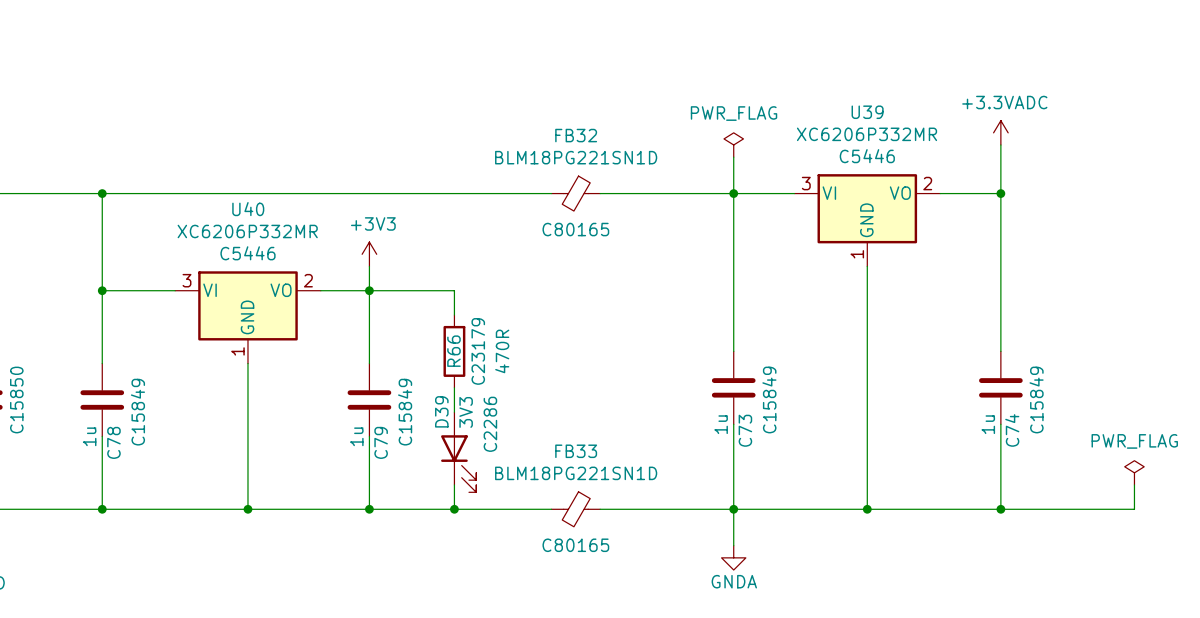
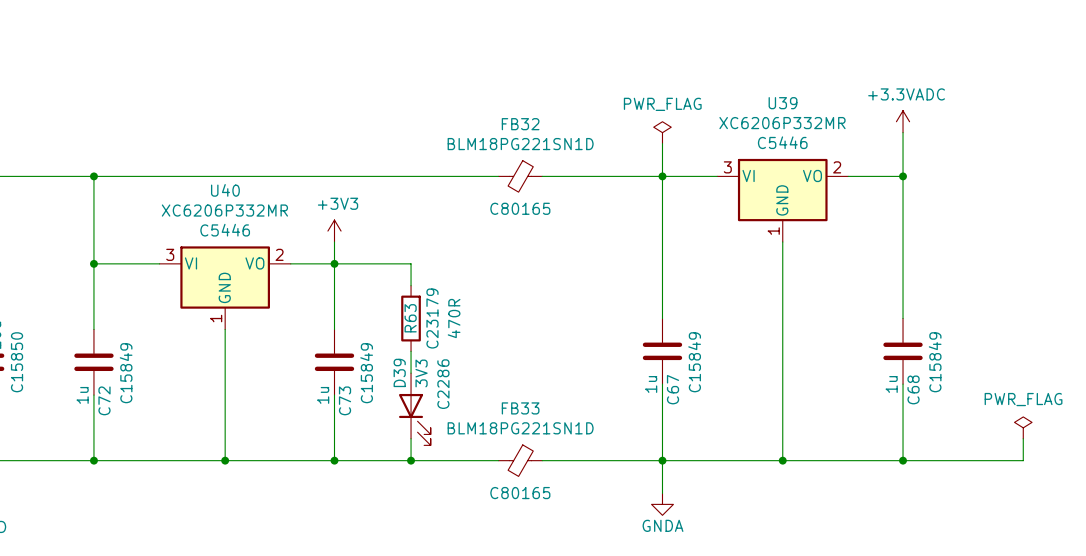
R66 name: R66 (453, 351) -> R63 (410, 318)
C73 name: C73 (745, 430) -> C67 (673, 389)
C74 name: C74 (1012, 430) -> C68 (913, 389)
C78 name: C78 (113, 442) -> C72 (104, 400)
C79 name: C79 (381, 442) -> C73 (345, 400)

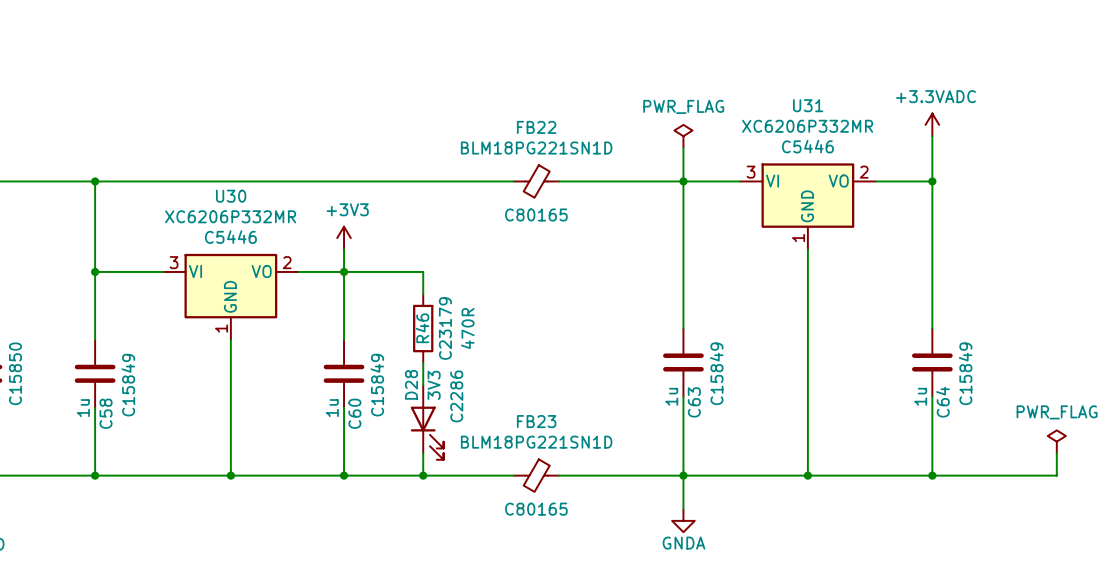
U39 name: U39 (783, 103) -> U31 (808, 105)
FB32 name: FB32 (520, 124) -> FB22 (536, 127)
U40 name: U40 (225, 190) -> U30 (231, 196)
R63 name: R63 (410, 318) -> R46 (422, 328)
D39 name: D39 (399, 372) -> D28 (411, 384)
C67 name: C67 (673, 389) -> C63 (694, 402)
C68 name: C68 (913, 389) -> C64 (942, 402)
C72 name: C72 (104, 400) -> C58 (106, 413)
C73 name: C73 (345, 400) -> C60 (354, 413)
FB33 name: FB33 (520, 408) -> FB23 (536, 421)

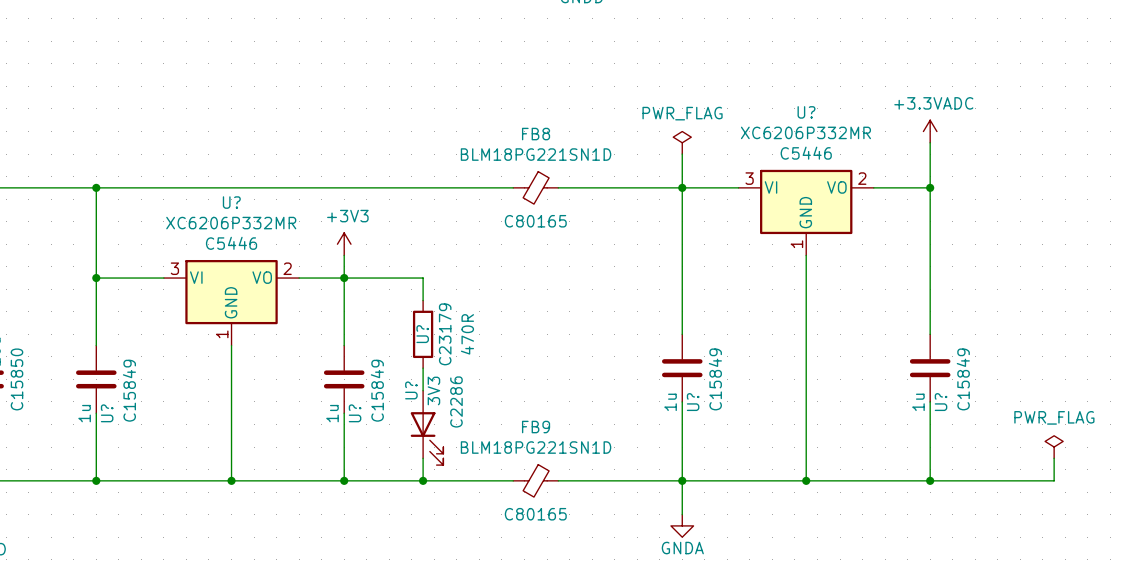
U31 name: U31 (808, 105) -> U? (806, 112)
FB22 name: FB22 (536, 127) -> FB8 (536, 134)
U30 name: U30 (231, 196) -> U? (231, 202)
R46 name: R46 (422, 328) -> U? (422, 334)
D28 name: D28 (411, 384) -> U? (411, 390)
C63 name: C63 (694, 402) -> U? (693, 402)
C64 name: C64 (942, 402) -> U? (941, 402)
C58 name: C58 (106, 413) -> U? (107, 413)
C60 name: C60 (354, 413) -> U? (355, 413)
FB23 name: FB23 (536, 421) -> FB9 (536, 427)

